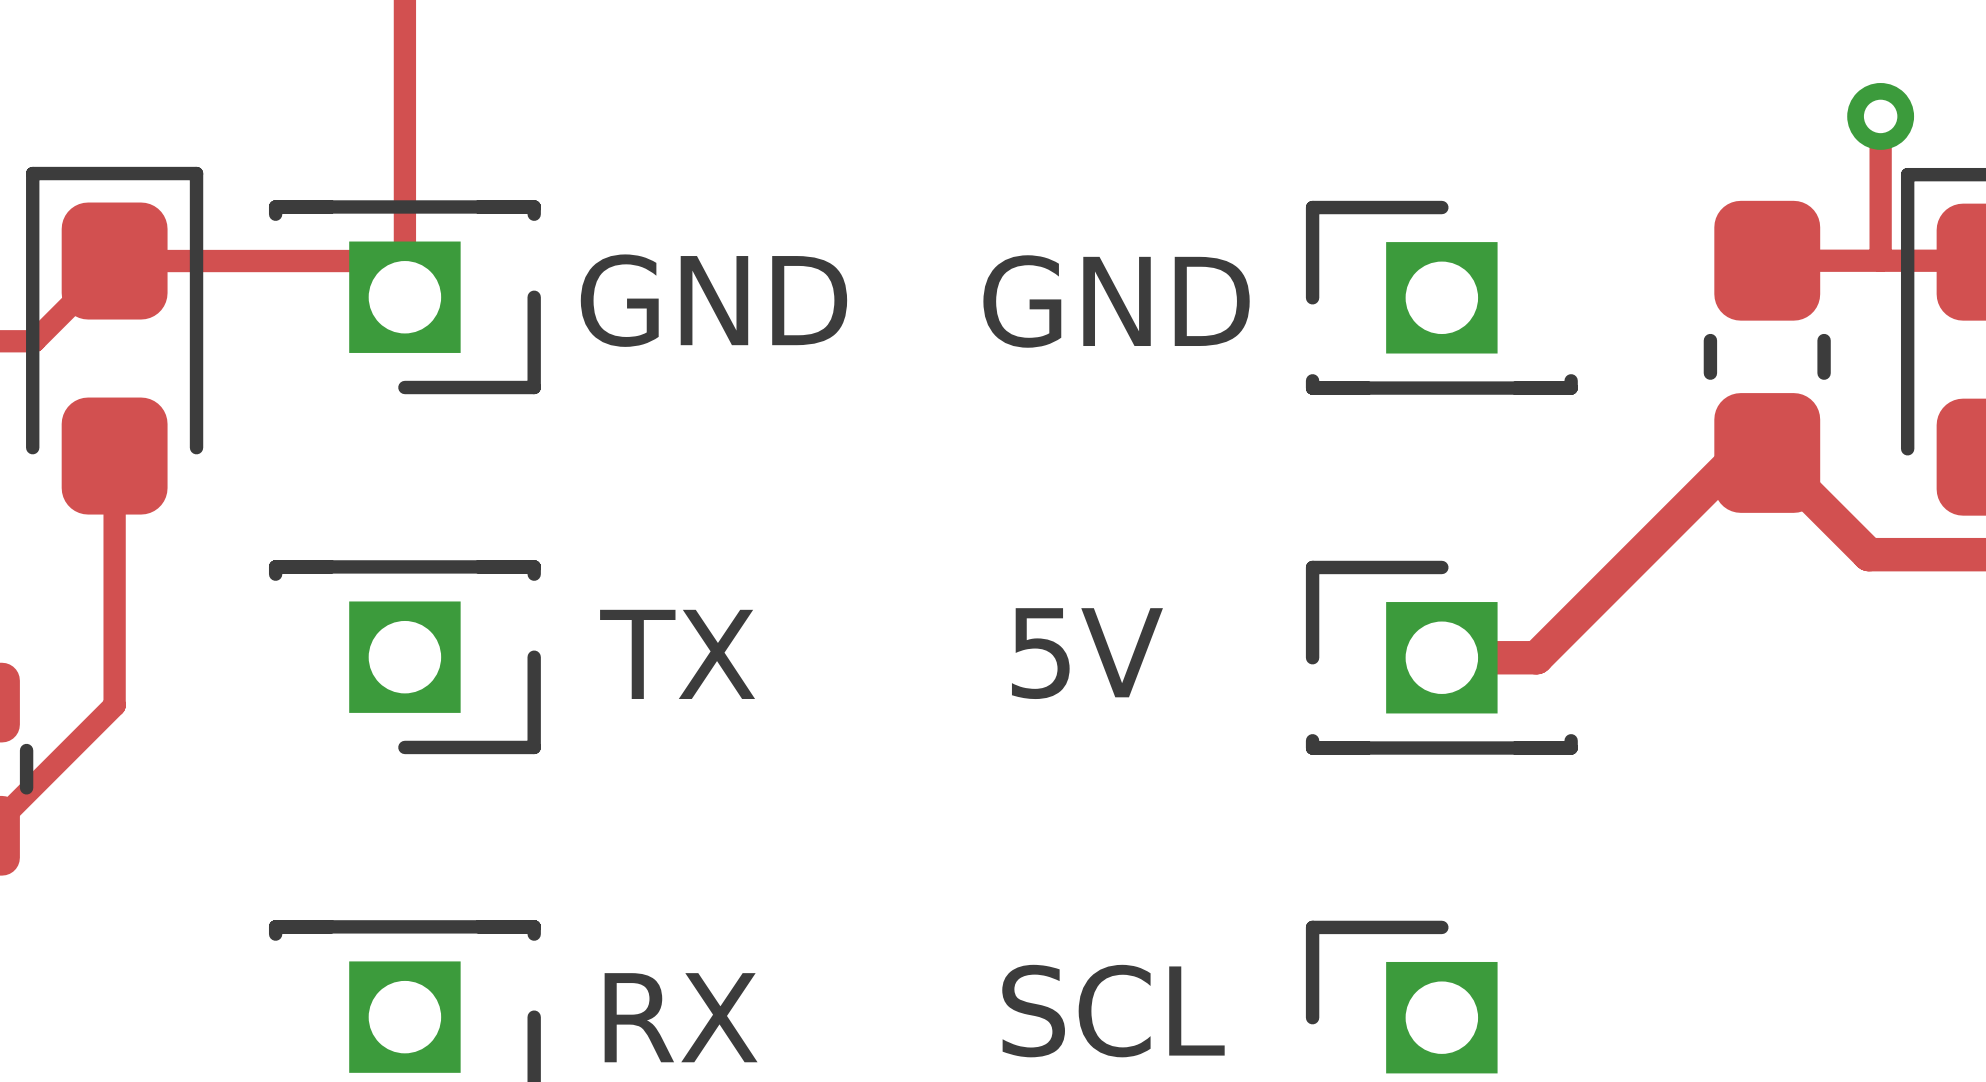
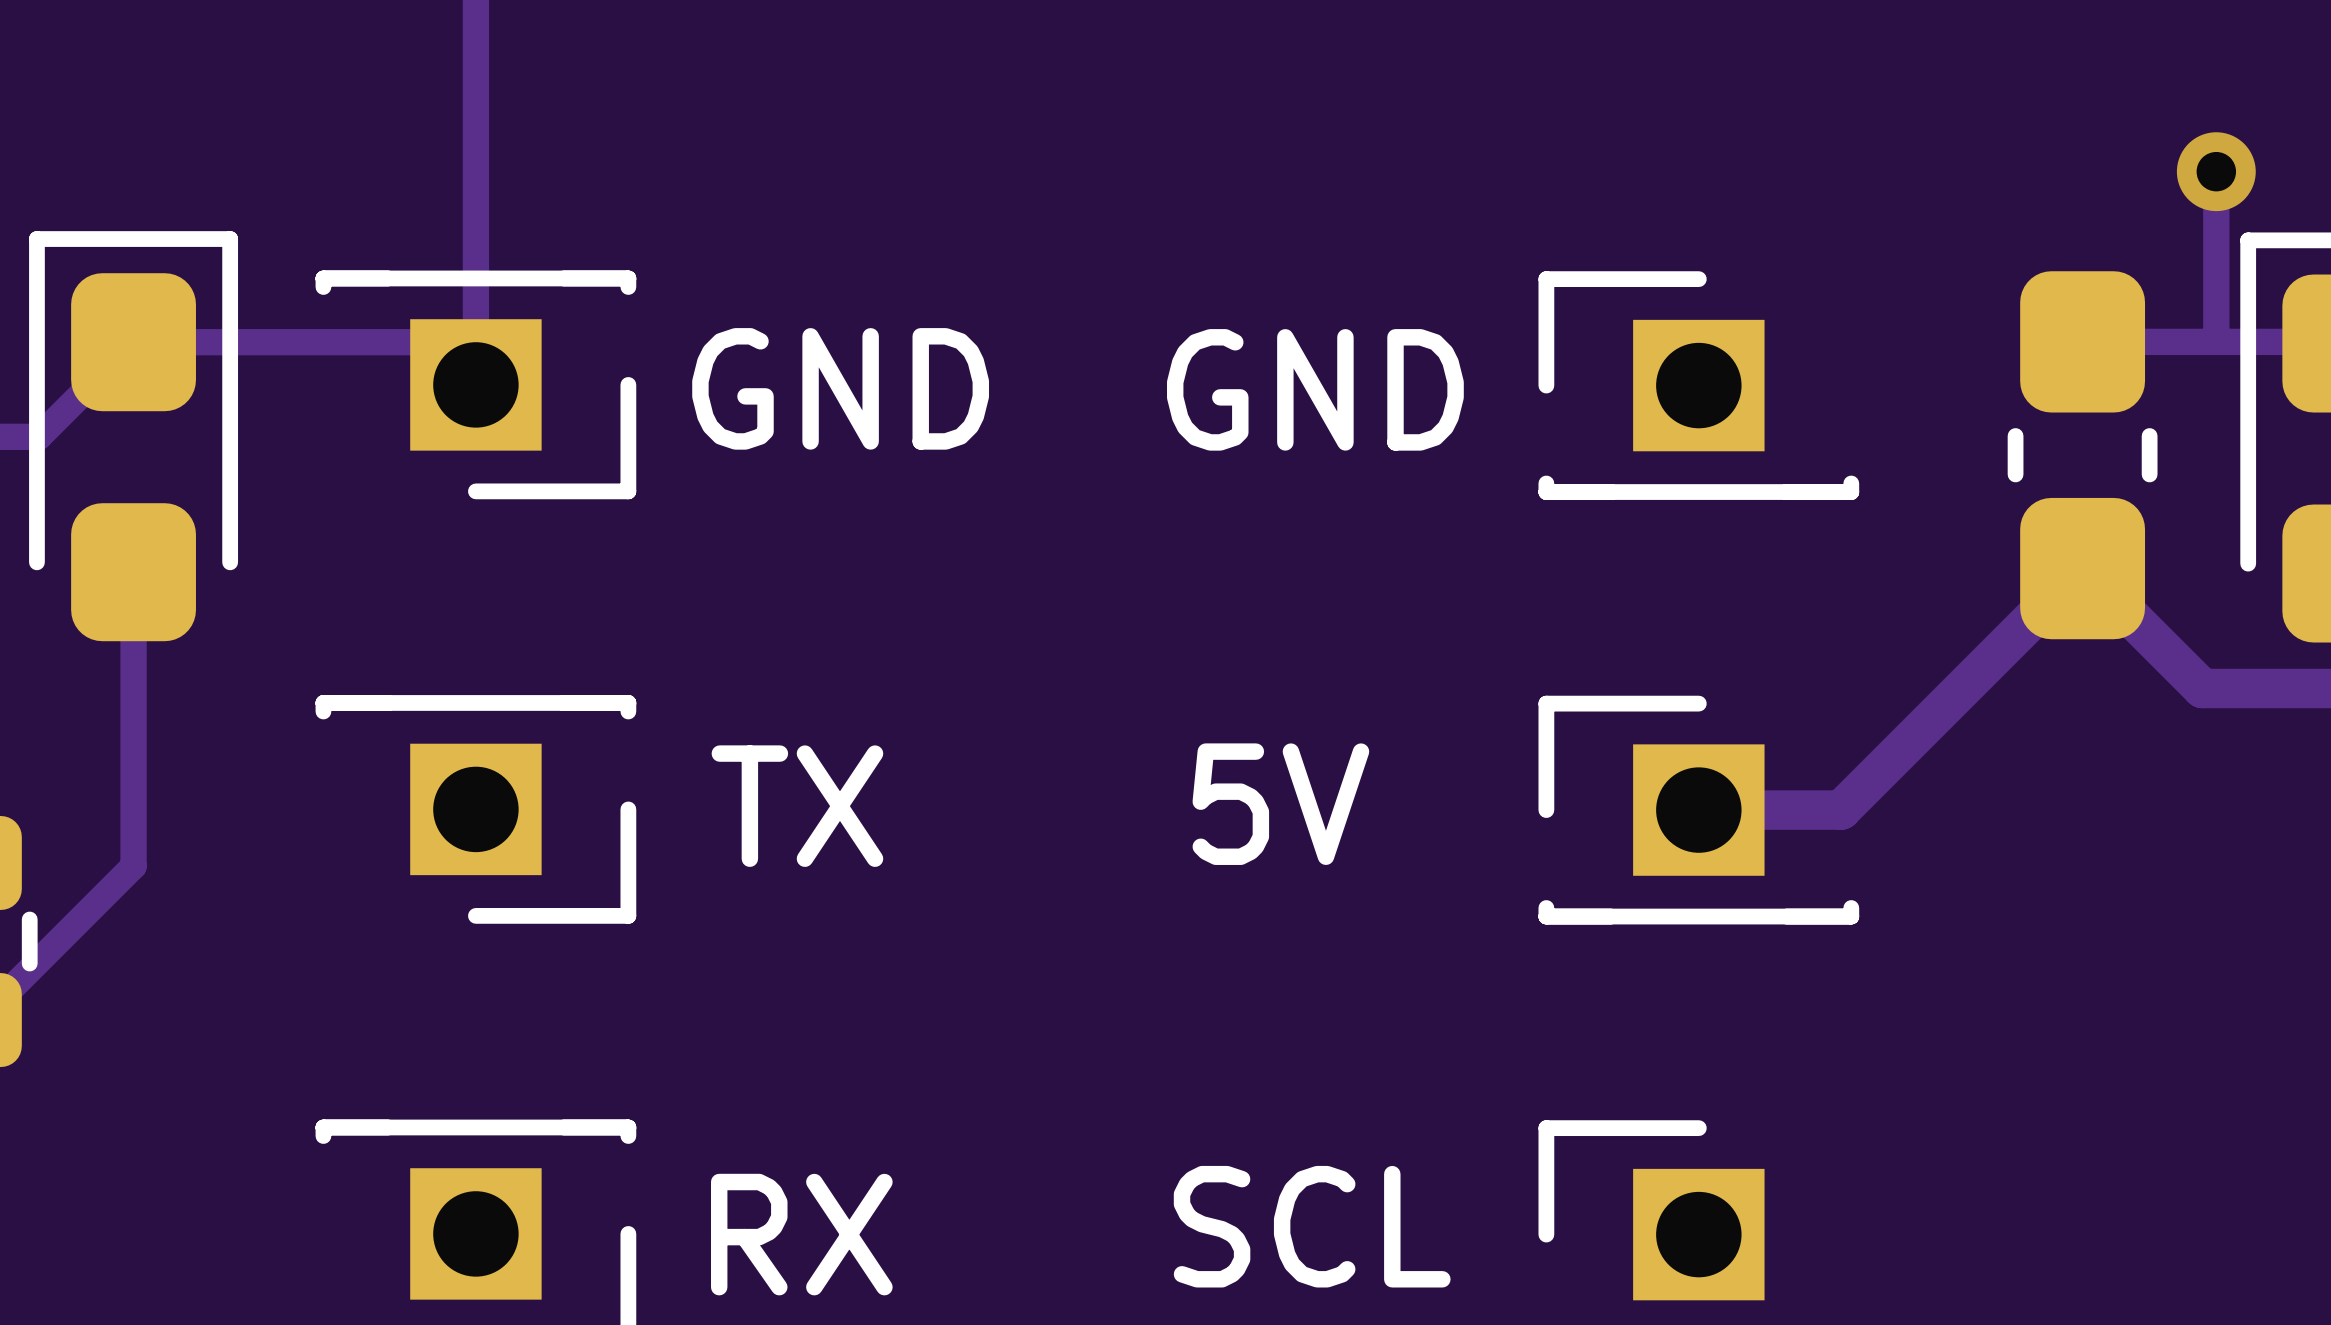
track: (1767, 452) (1741, 452) (1536, 657) -> (2082, 568) (1841, 810) (1810, 810)

